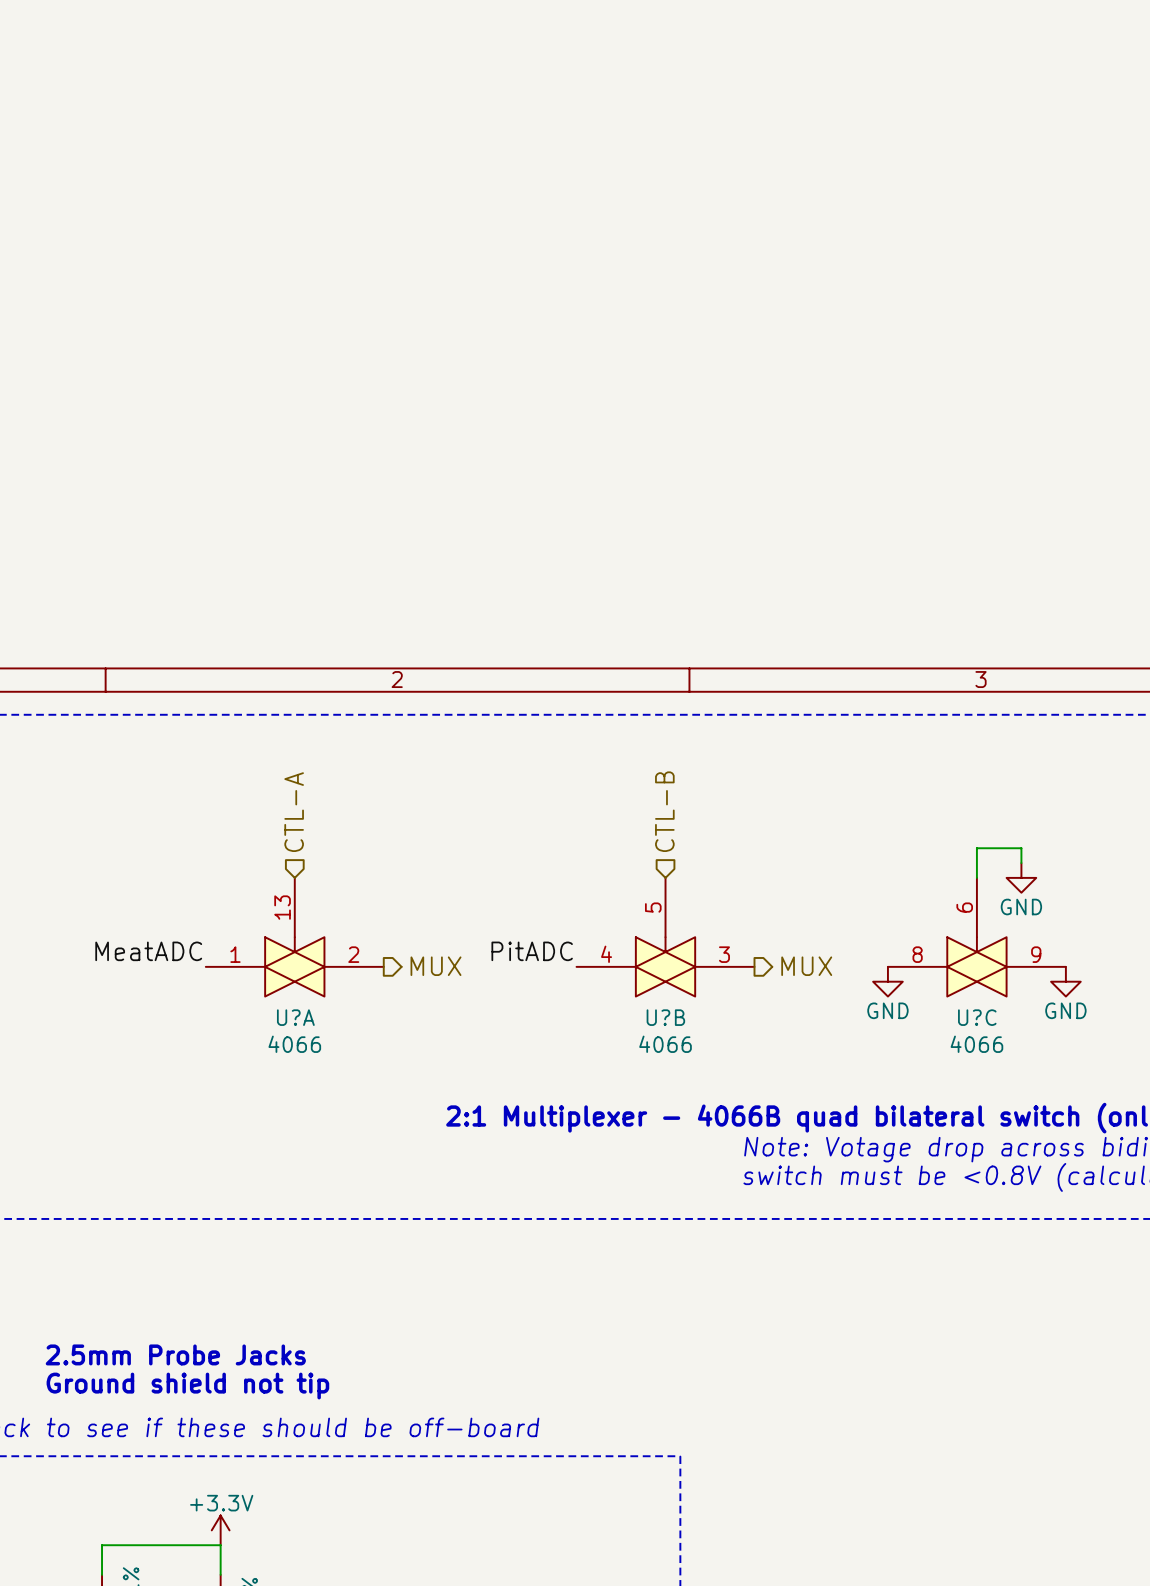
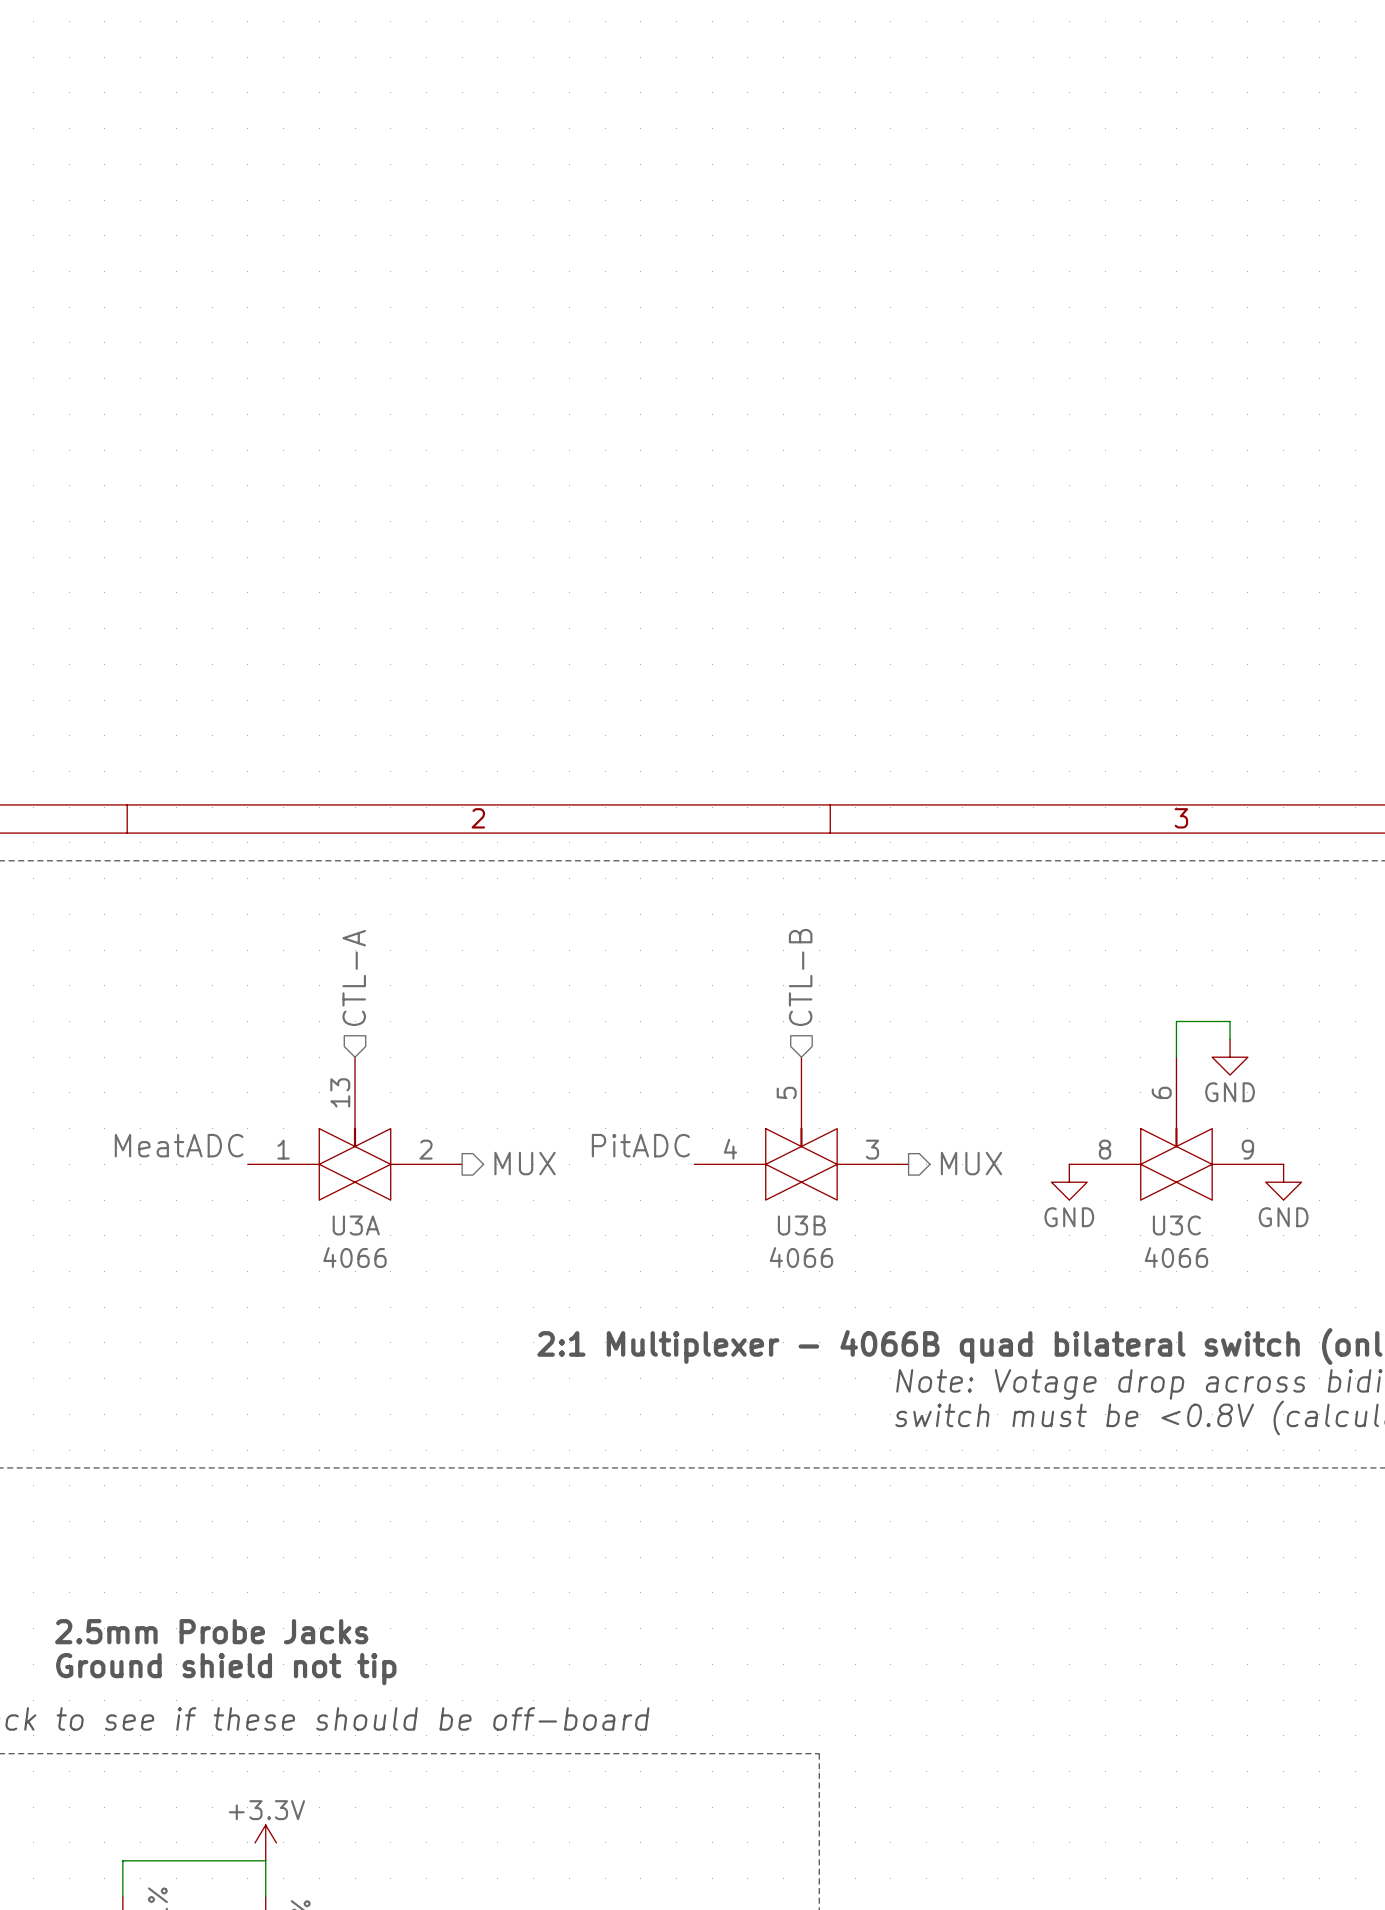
U?A name: U?A (295, 1017) -> U3A (356, 1225)
U?B name: U?B (665, 1017) -> U3B (801, 1225)
U?C name: U?C (977, 1017) -> U3C (1176, 1225)

